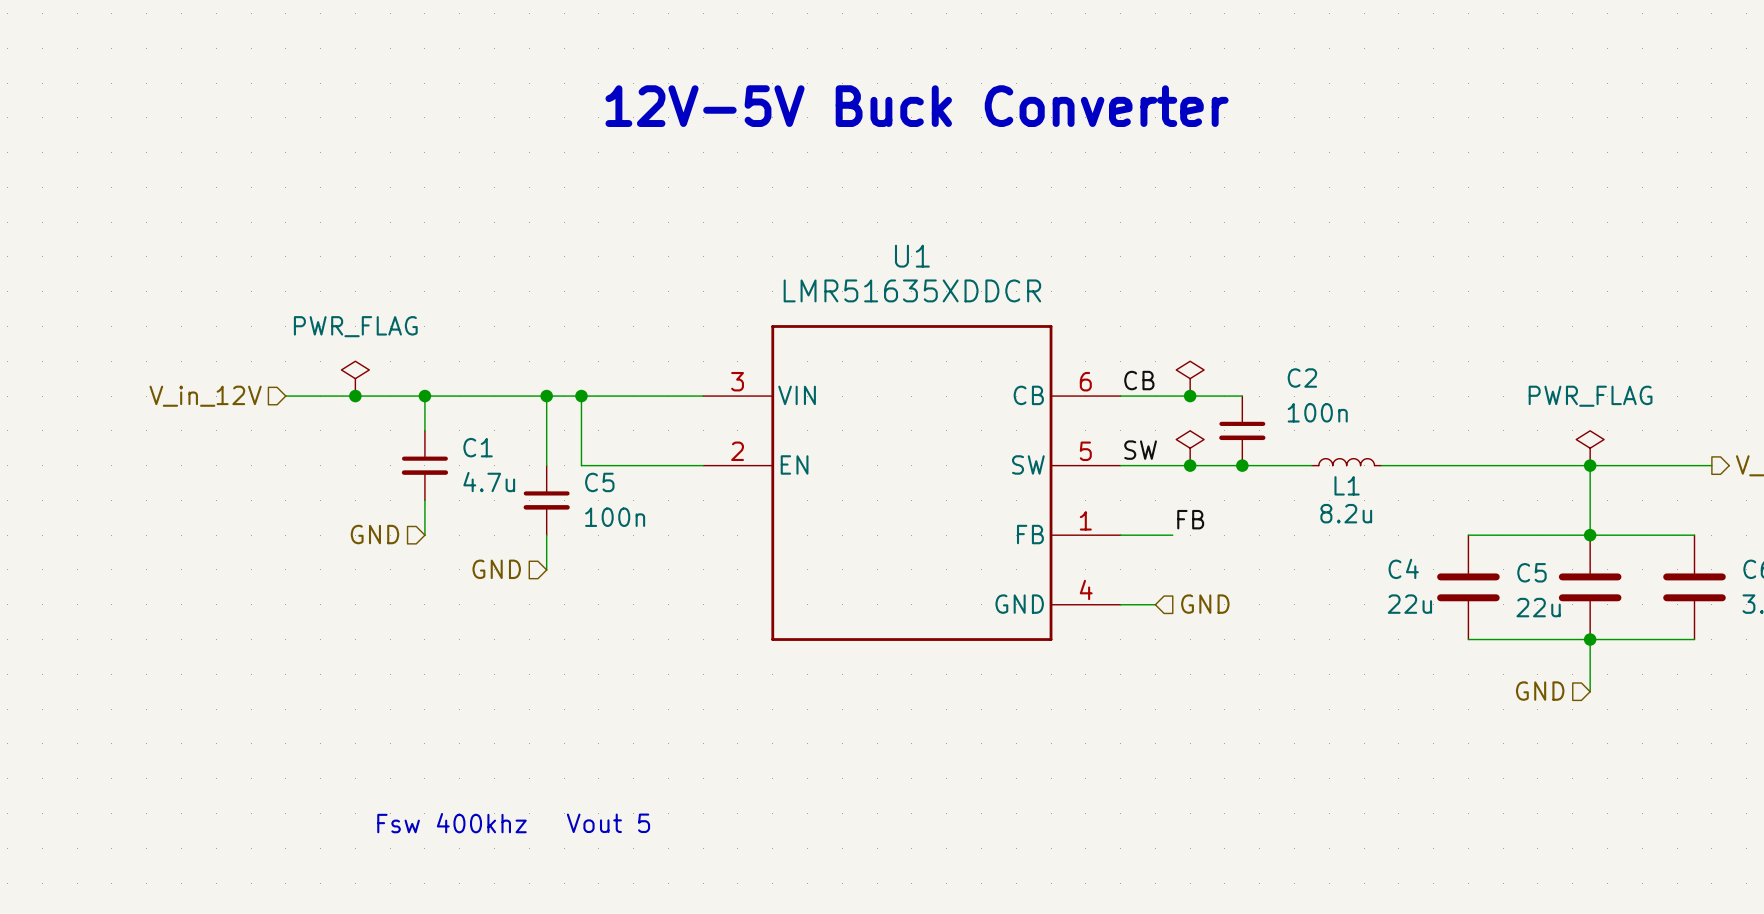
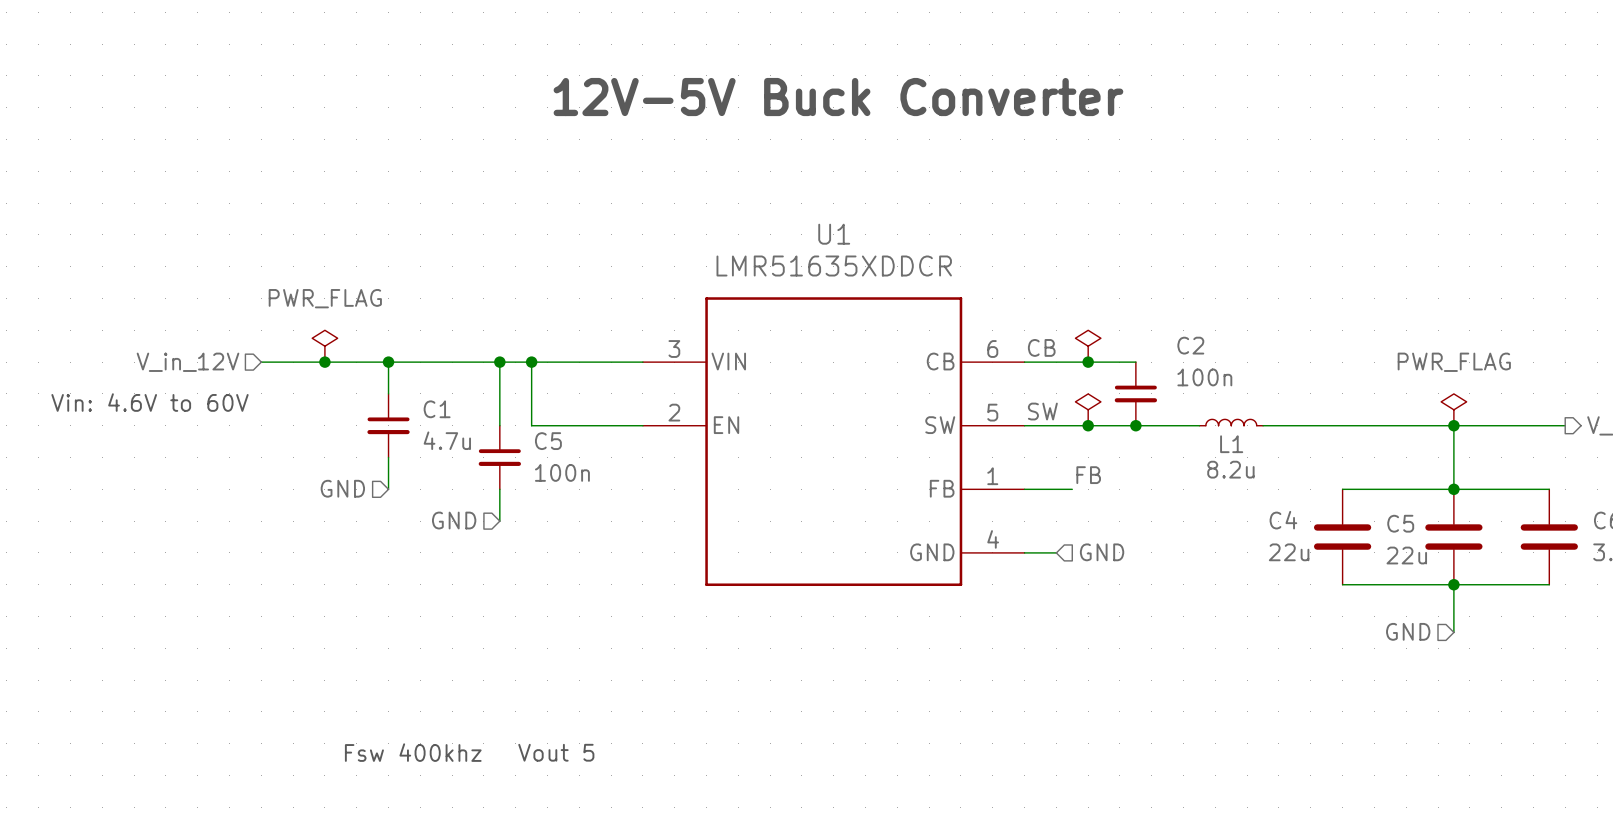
text: none -> Vin: 4.6V to 60V (150, 402)

